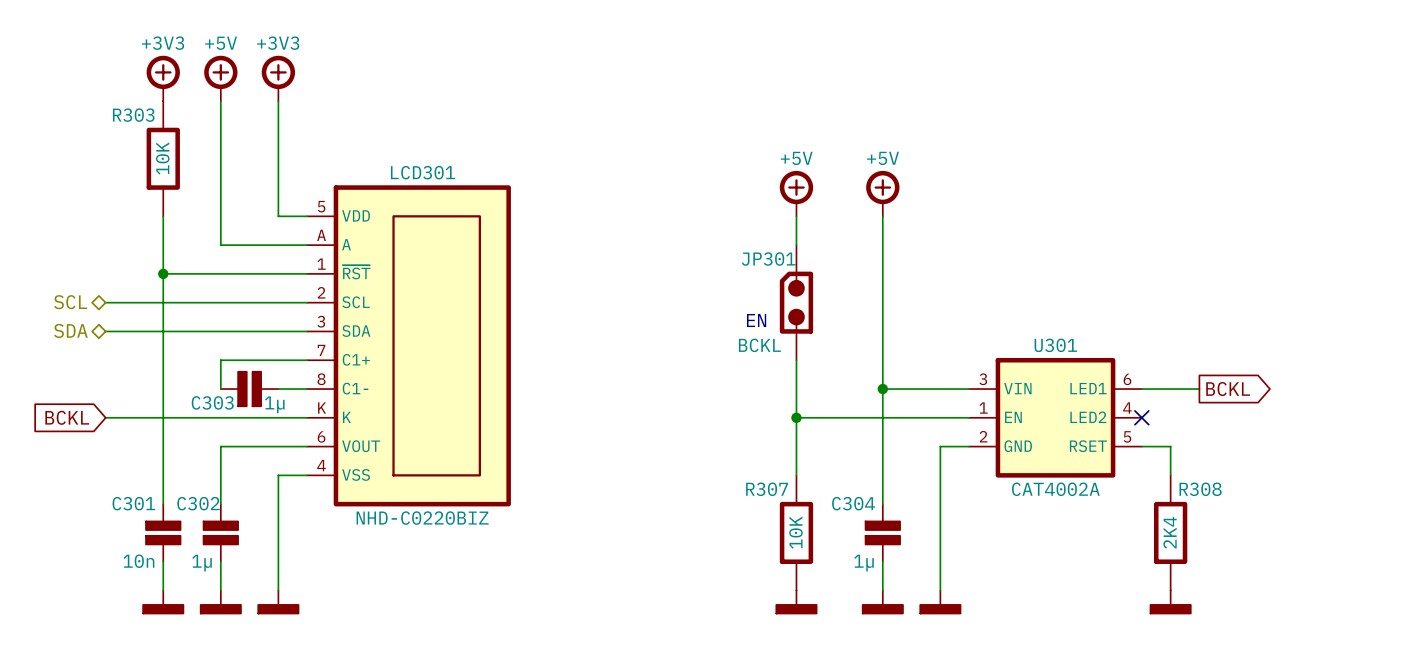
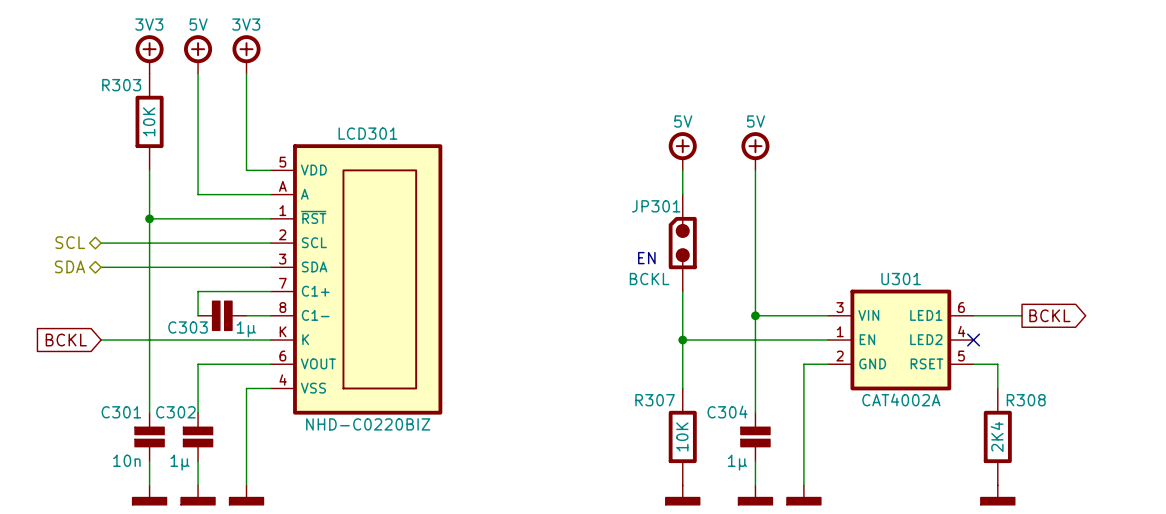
power symbol text: +3V3 (163, 43) -> 3V3 (149, 24)
power symbol text: +5V (221, 43) -> 5V (198, 24)
power symbol text: +3V3 (278, 43) -> 3V3 (246, 24)
power symbol text: +5V (796, 158) -> 5V (683, 121)
power symbol text: +5V (883, 158) -> 5V (755, 121)

